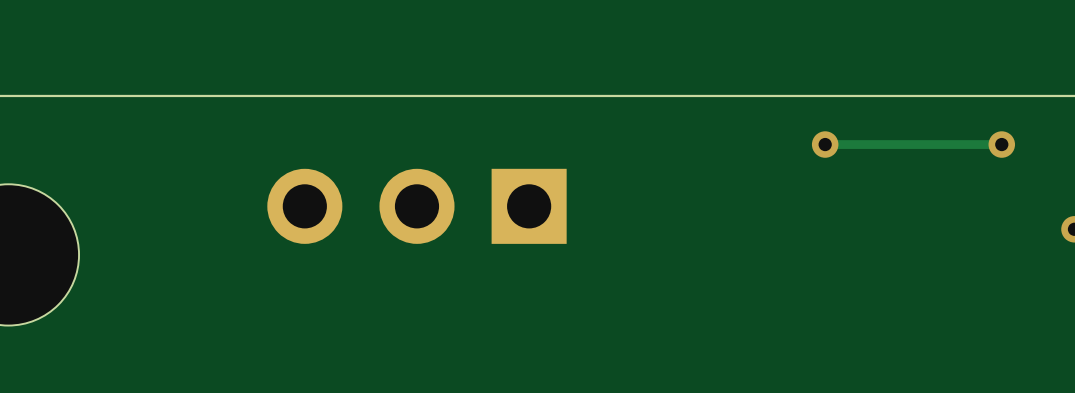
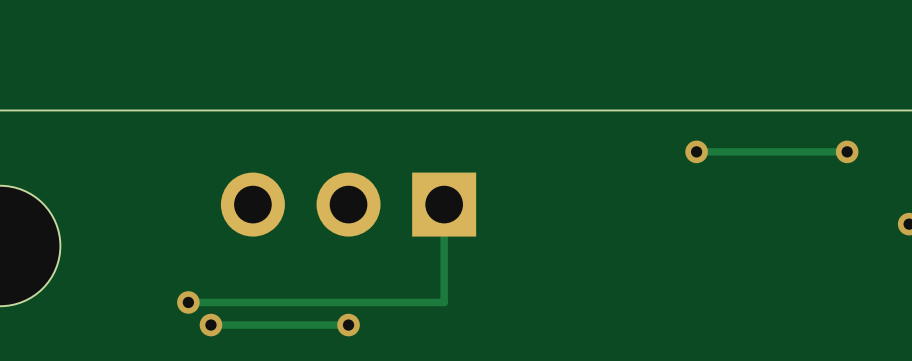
track: none -> (444, 204) (444, 302) (188, 302)
via: none -> (188, 302)
via: none -> (210, 325)
track: none -> (348, 325) (210, 325)
via: none -> (348, 325)

